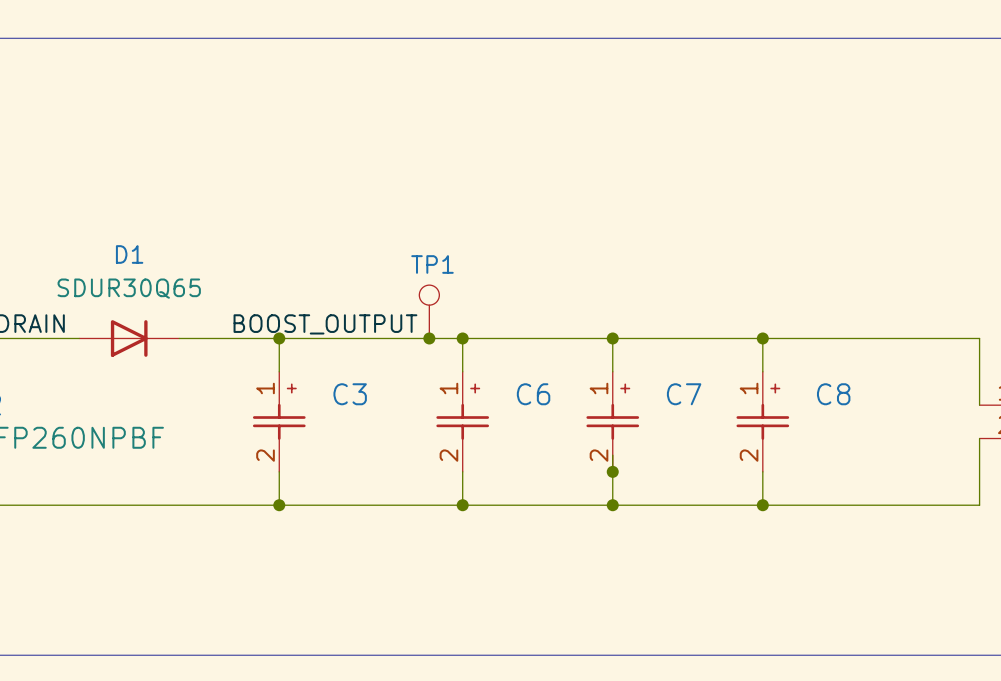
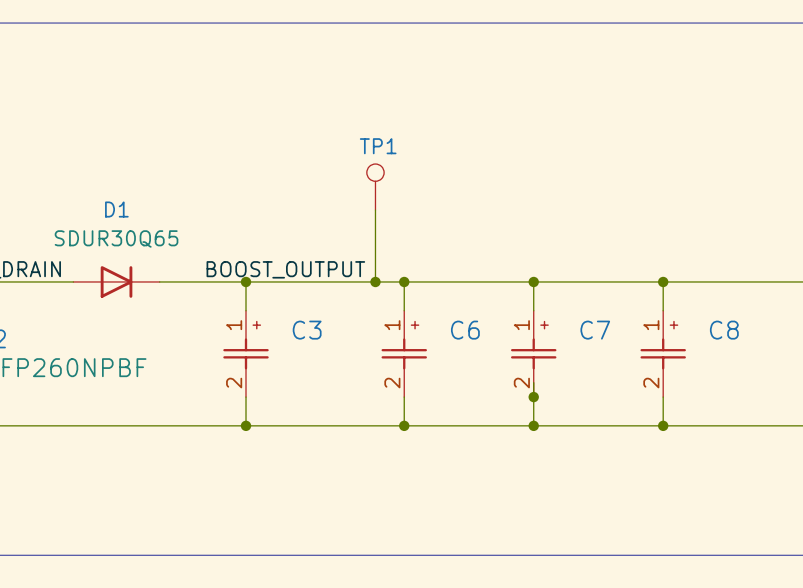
wire: none -> (375, 210) (375, 281)
TP1 position: (429, 311) -> (375, 187)

